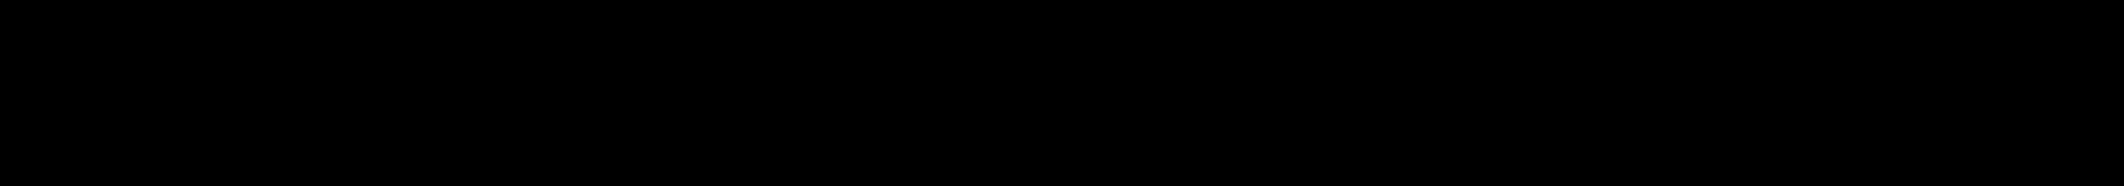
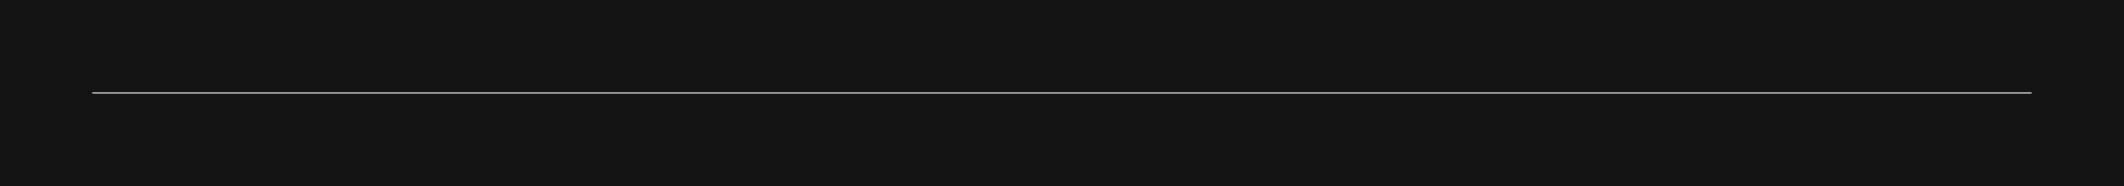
board edge: none -> (2031, 92) (92, 92)

